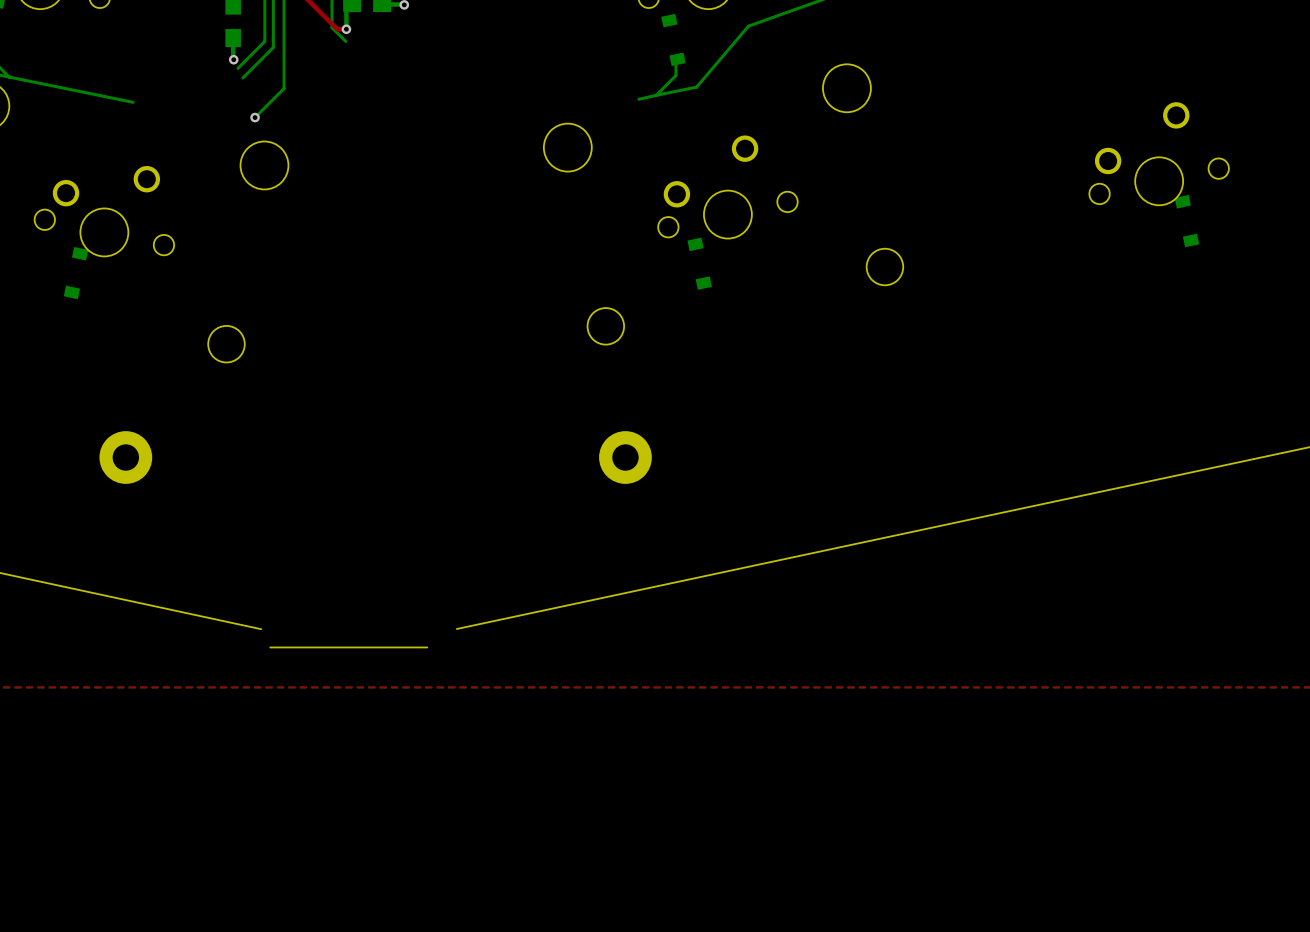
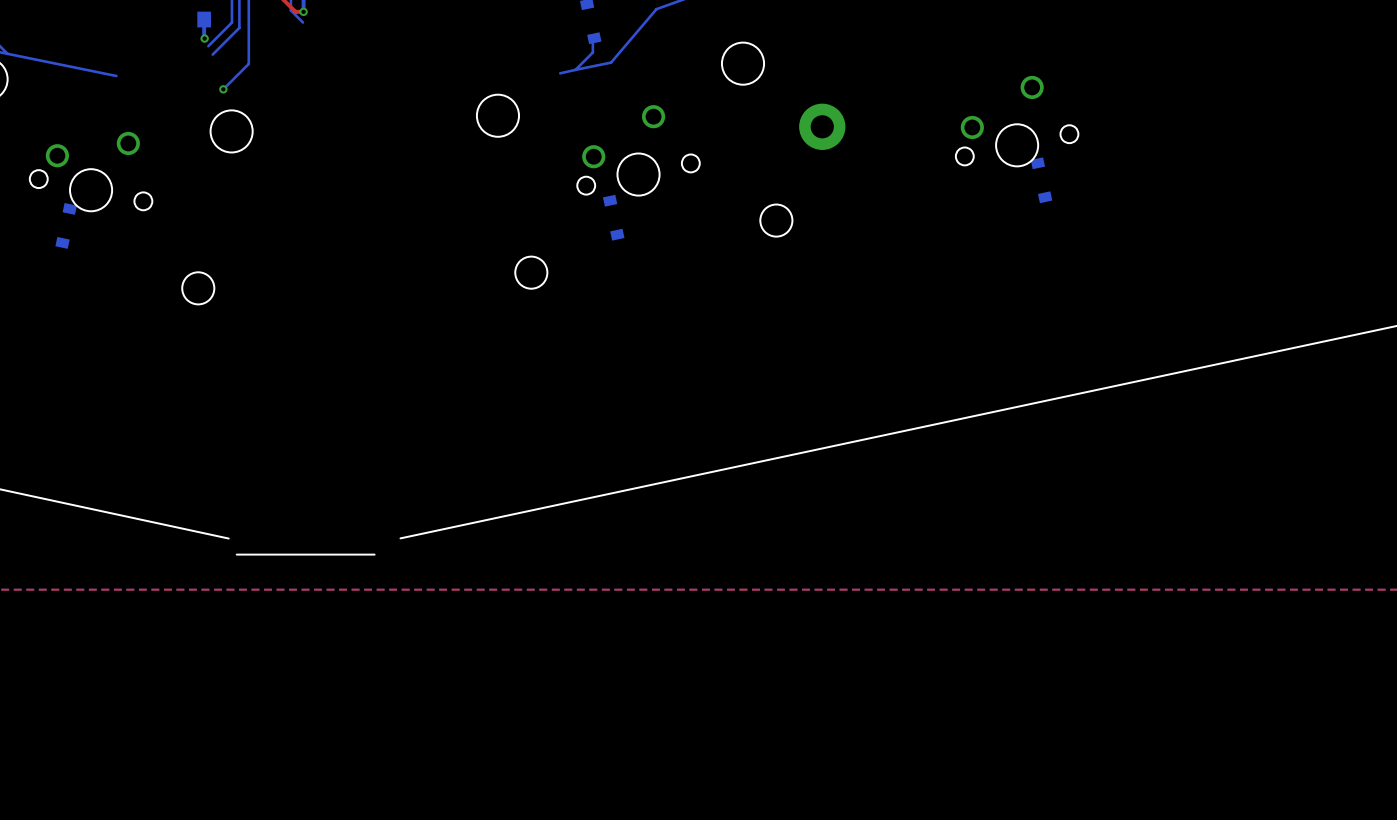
part: none -> (822, 126)
part: (125, 457) -> none
part: (625, 457) -> none

